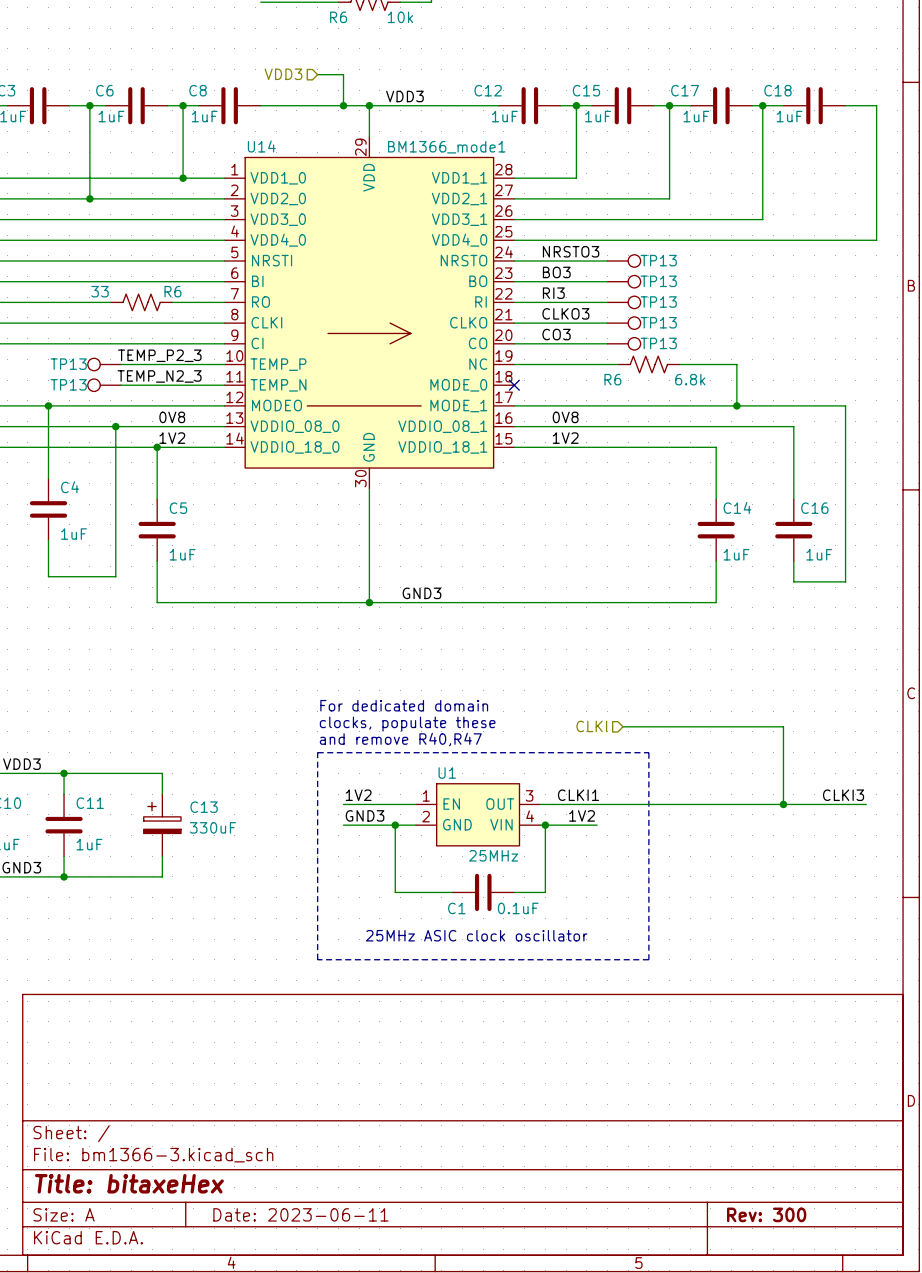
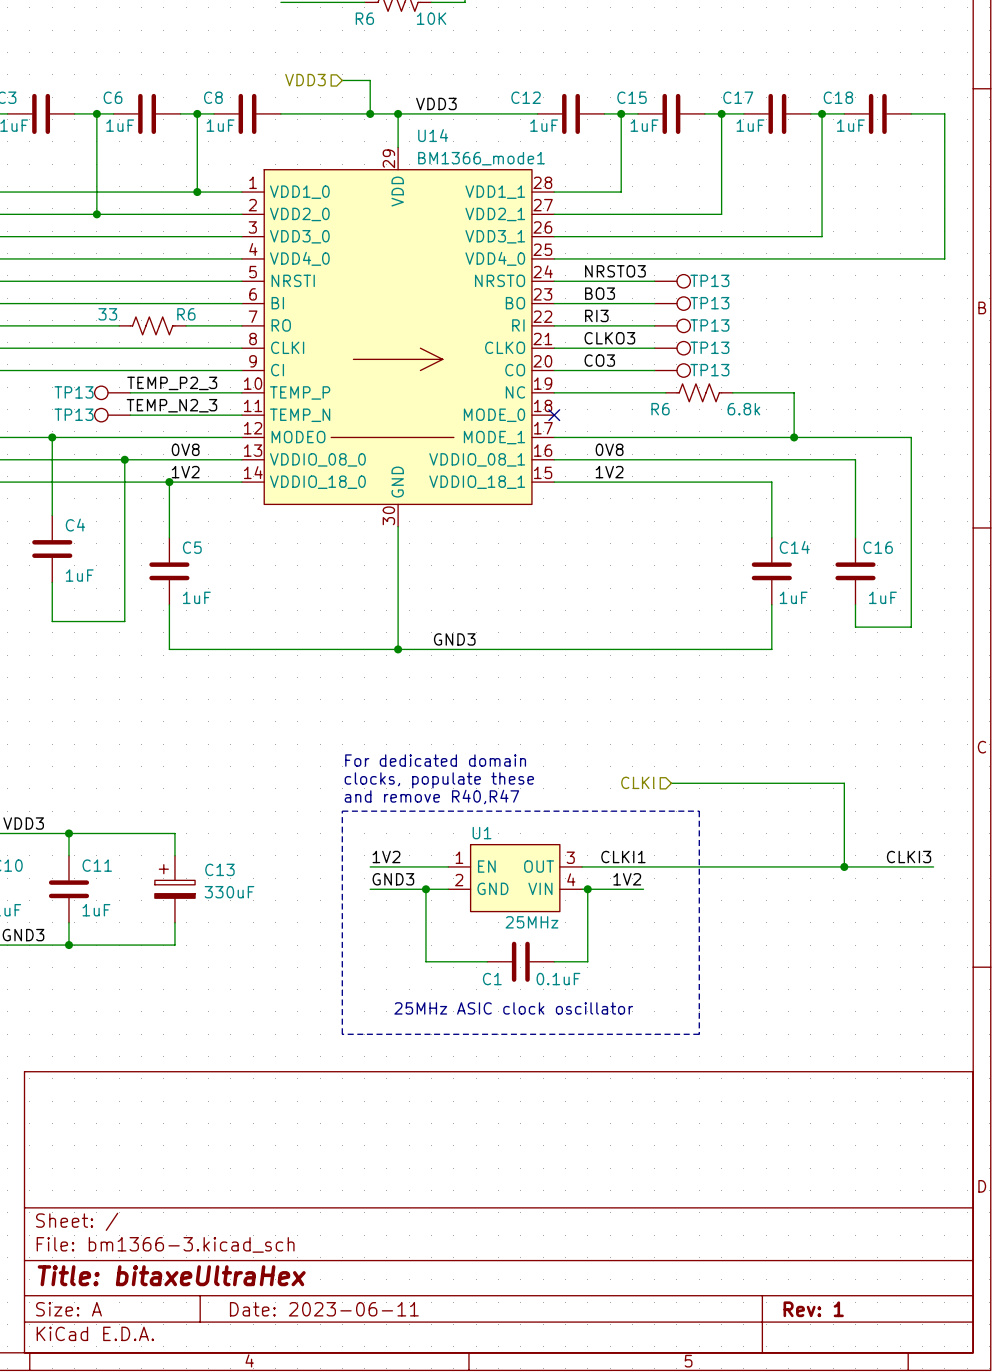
R6 value: 10k (400, 17) -> 10K (431, 18)
U14 name position: U14 (261, 146) -> U14 (433, 135)
title block: Title: bitaxeHex (129, 1183) -> Title: bitaxeUltraHex (171, 1275)
title block: Rev: 300 (766, 1214) -> Rev: 1 (813, 1309)

